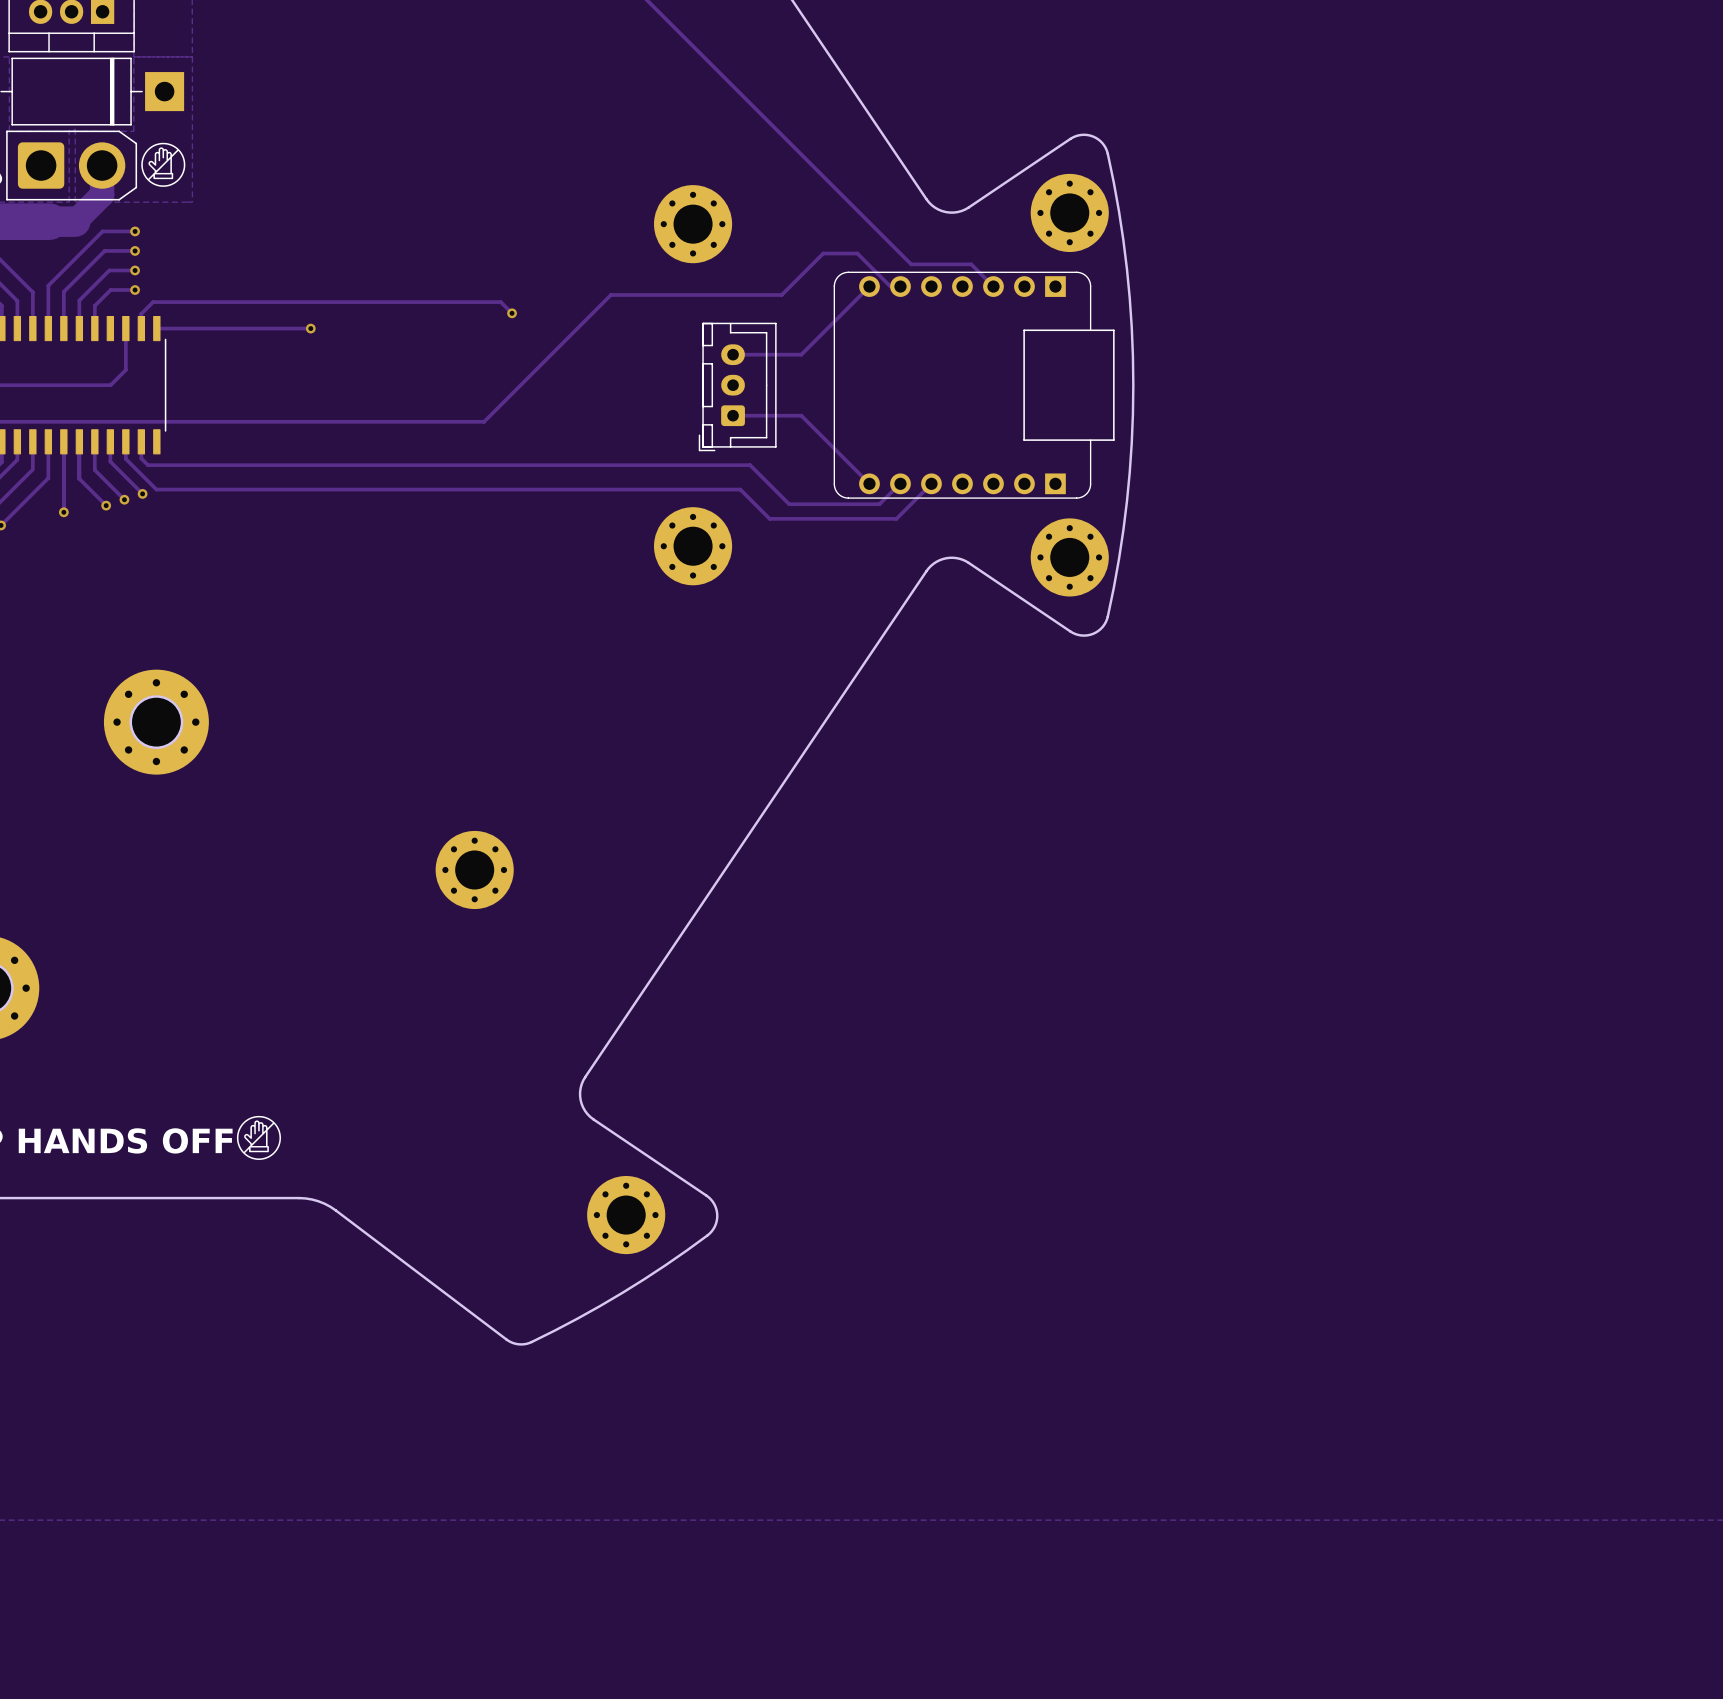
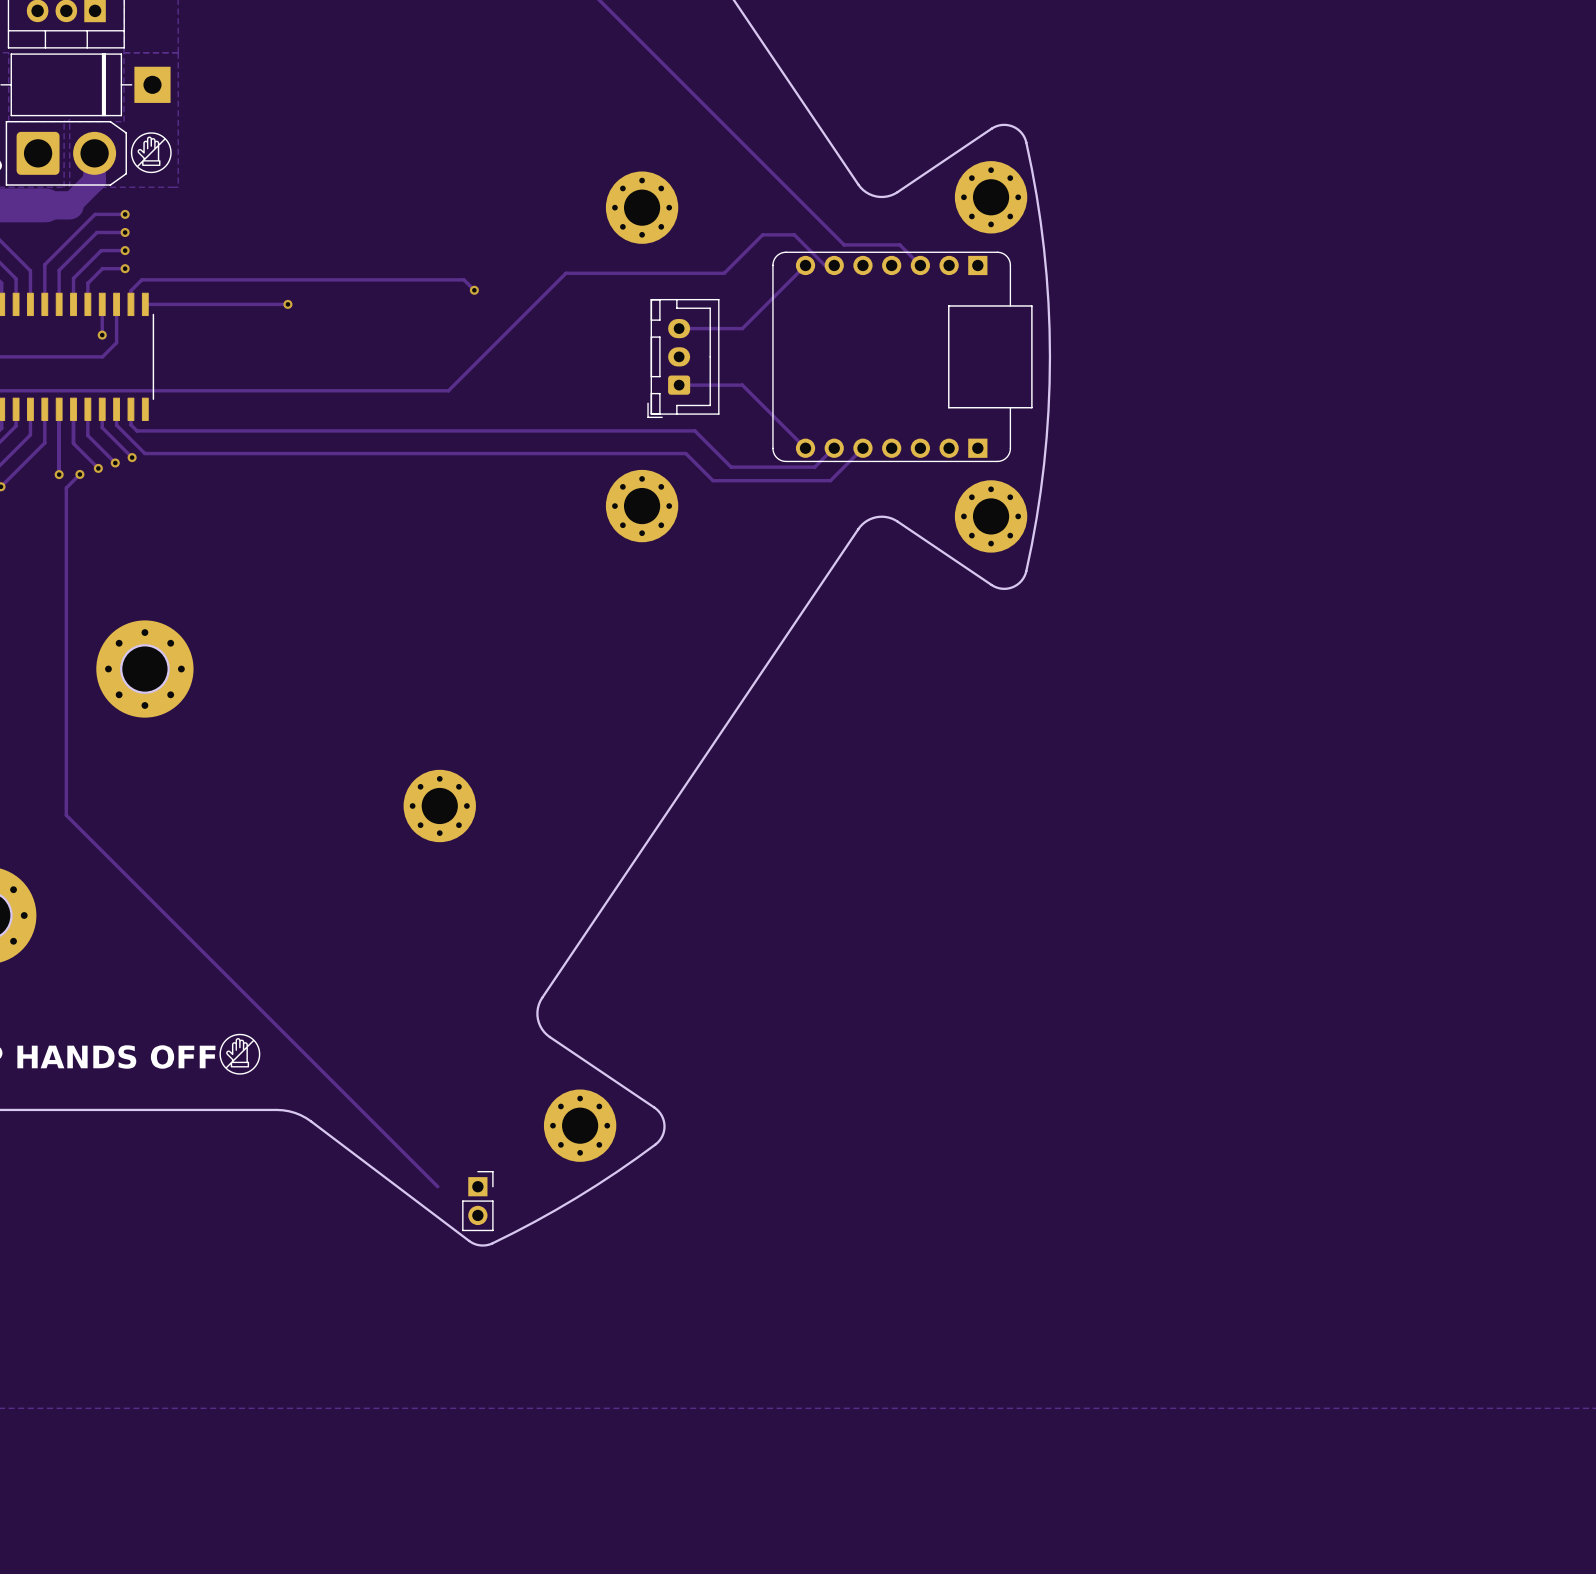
track: none -> (102, 304) (102, 335)
via: none -> (102, 335)
track: none -> (79, 474) (66, 488) (66, 815) (437, 1186)
via: none -> (79, 474)
part: none -> (477, 1201)

